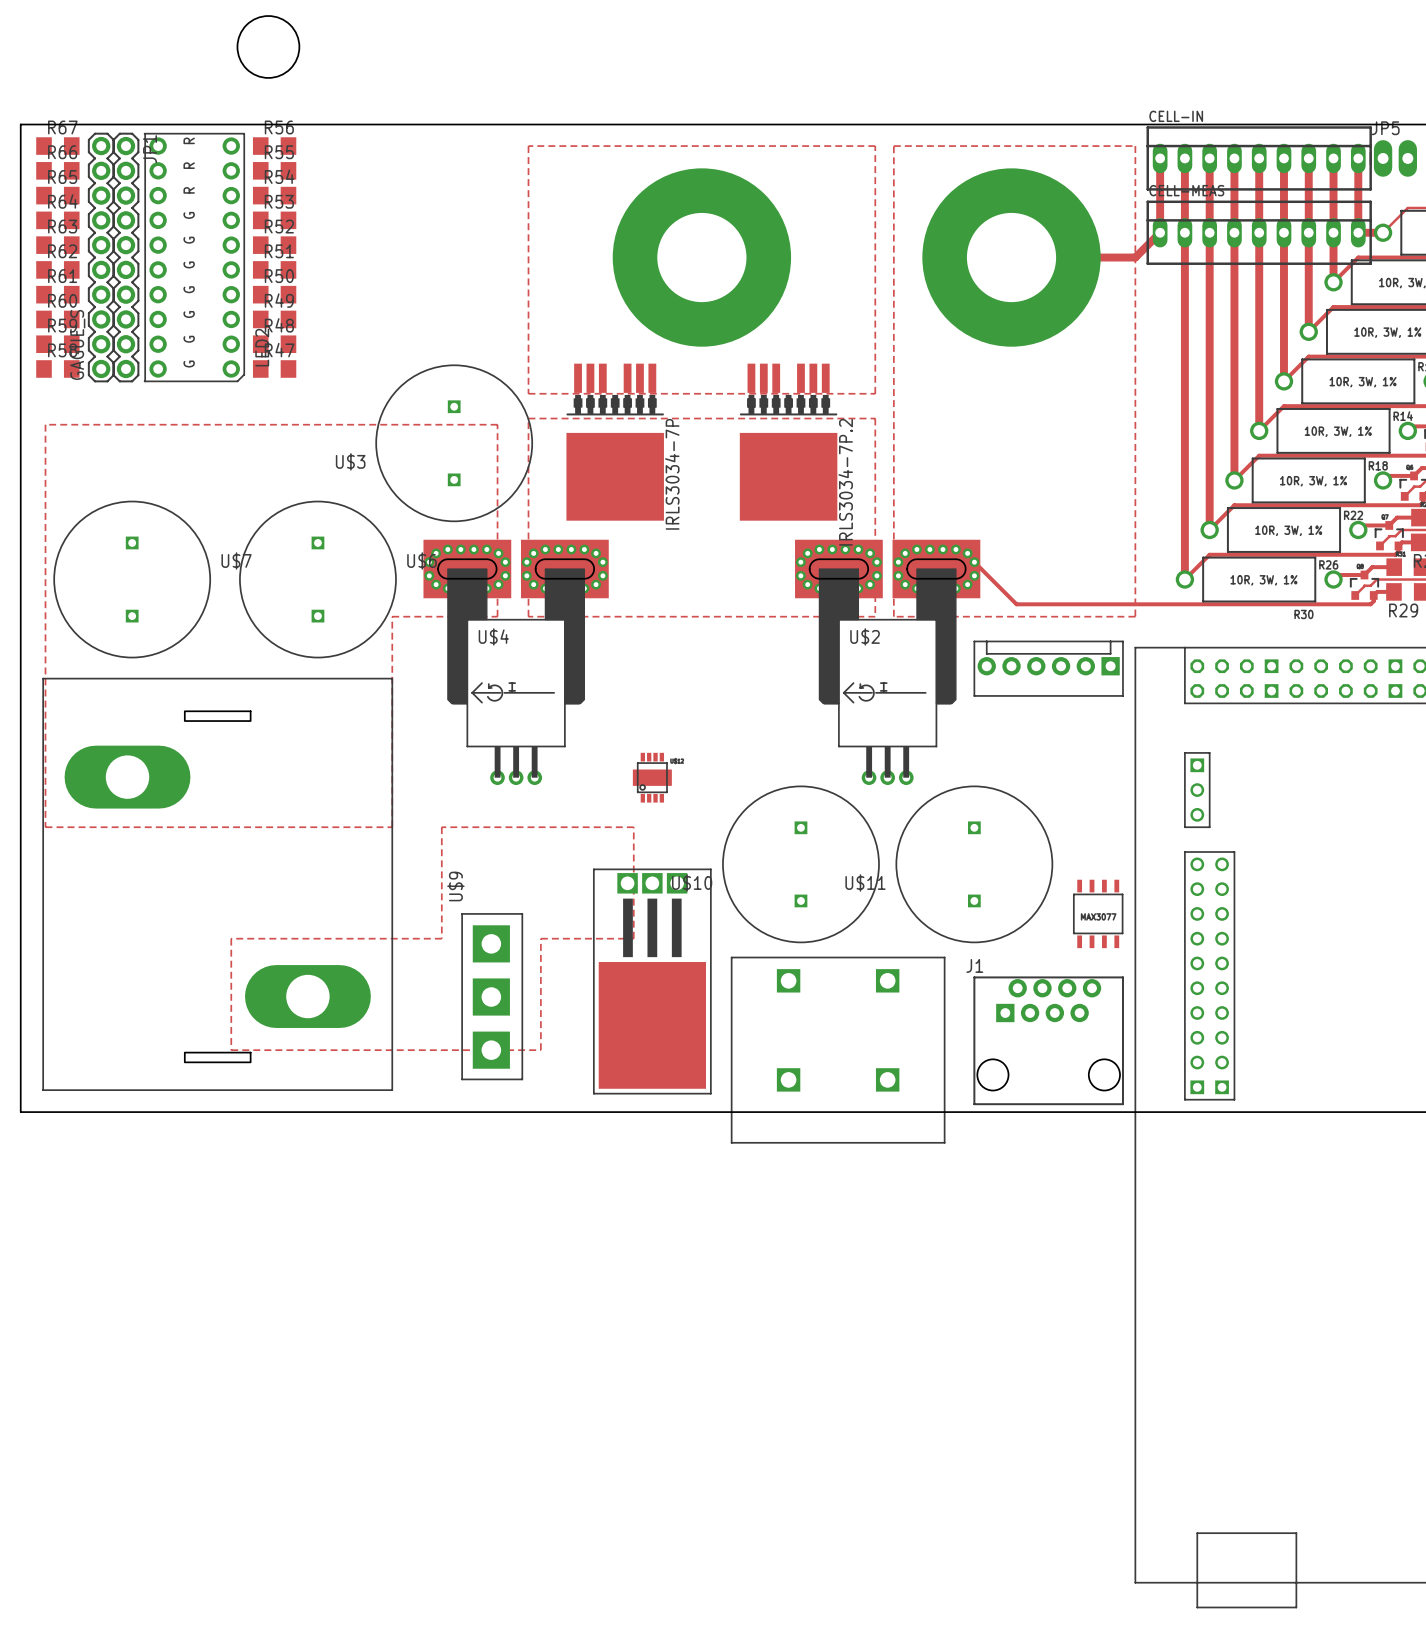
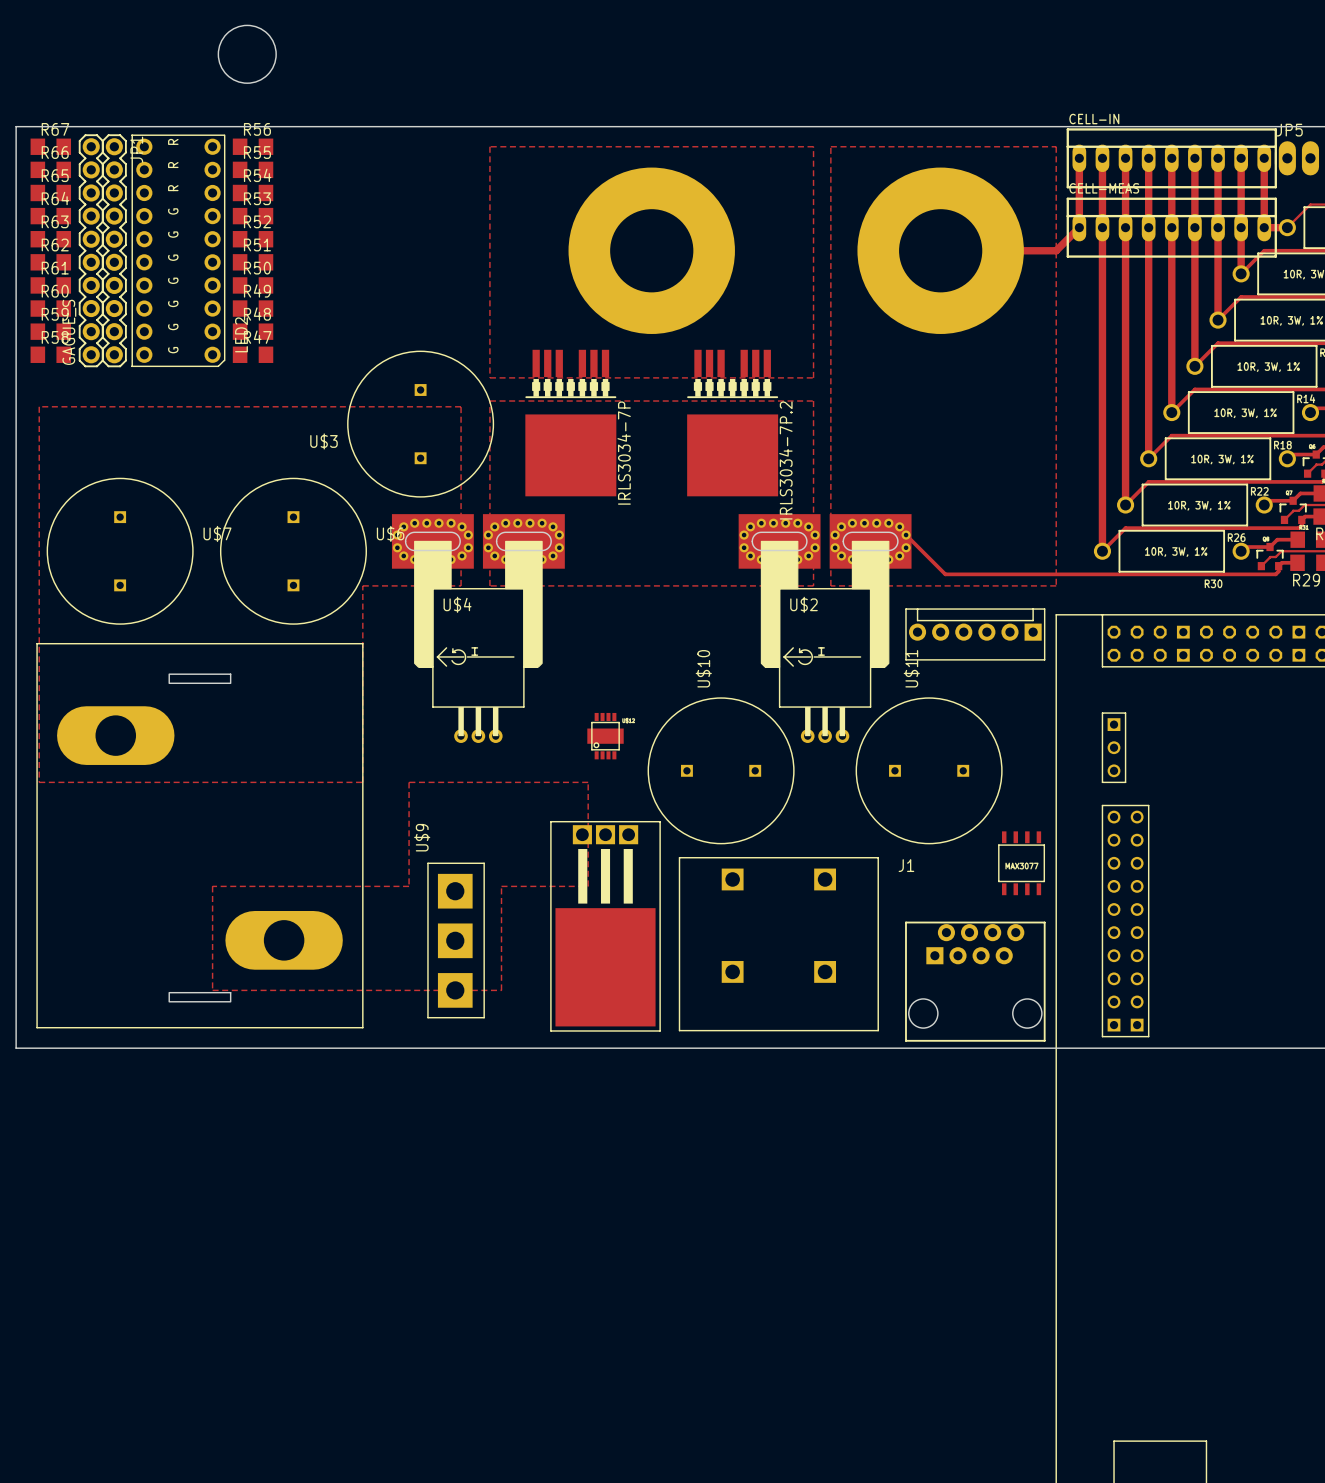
U$10 rotation: 0° (800, 864) -> 90° clockwise (721, 770)
U$11 rotation: 0° (974, 864) -> 90° clockwise (929, 770)
J1 position: (838, 1050) -> (778, 944)

